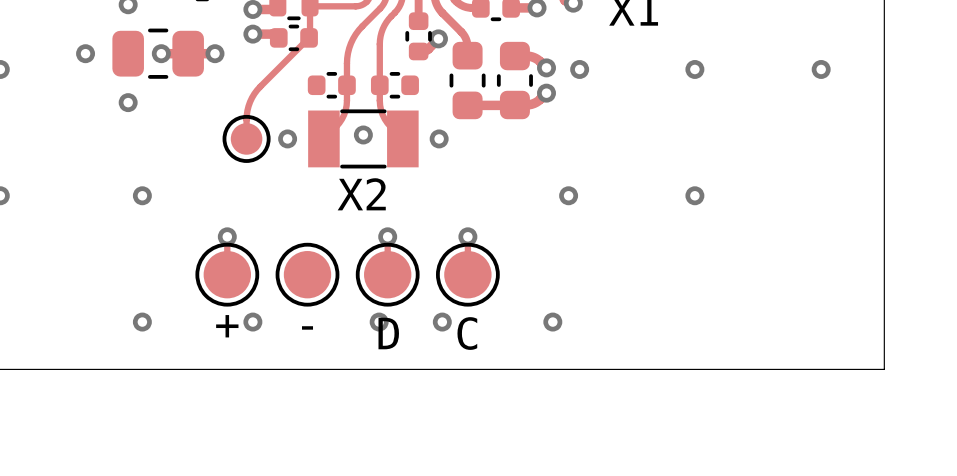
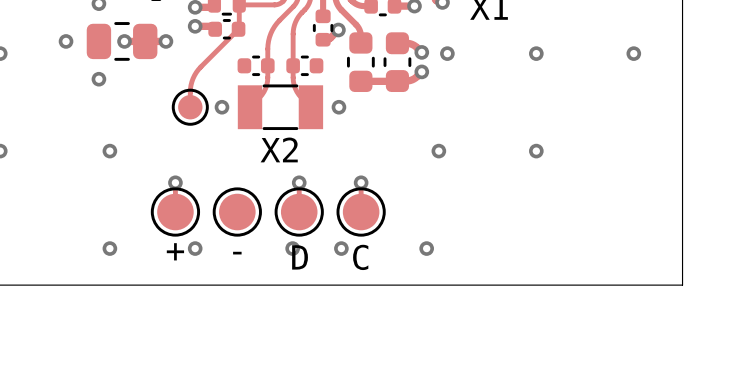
via: (363, 134) -> none

